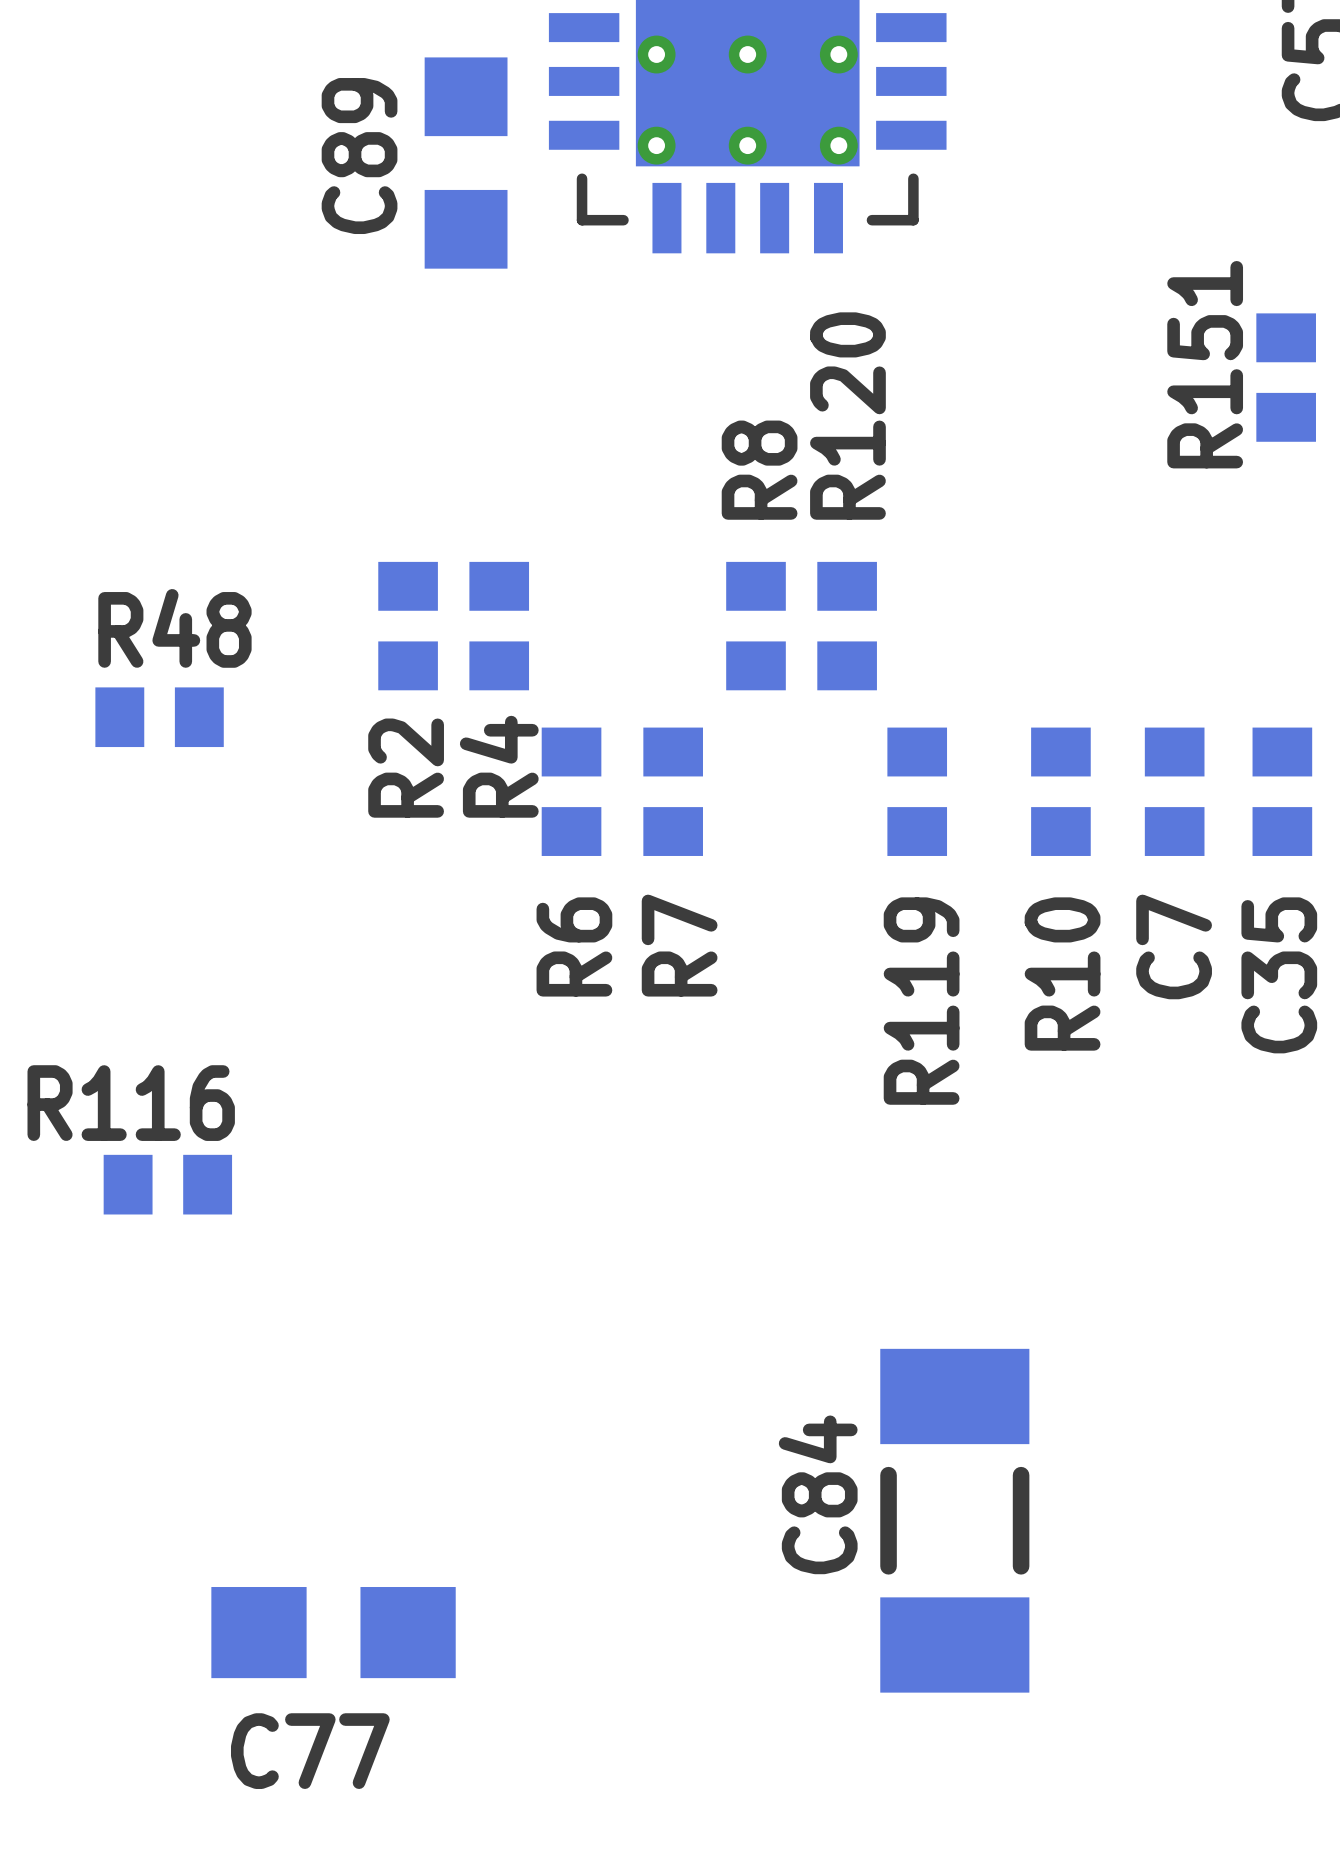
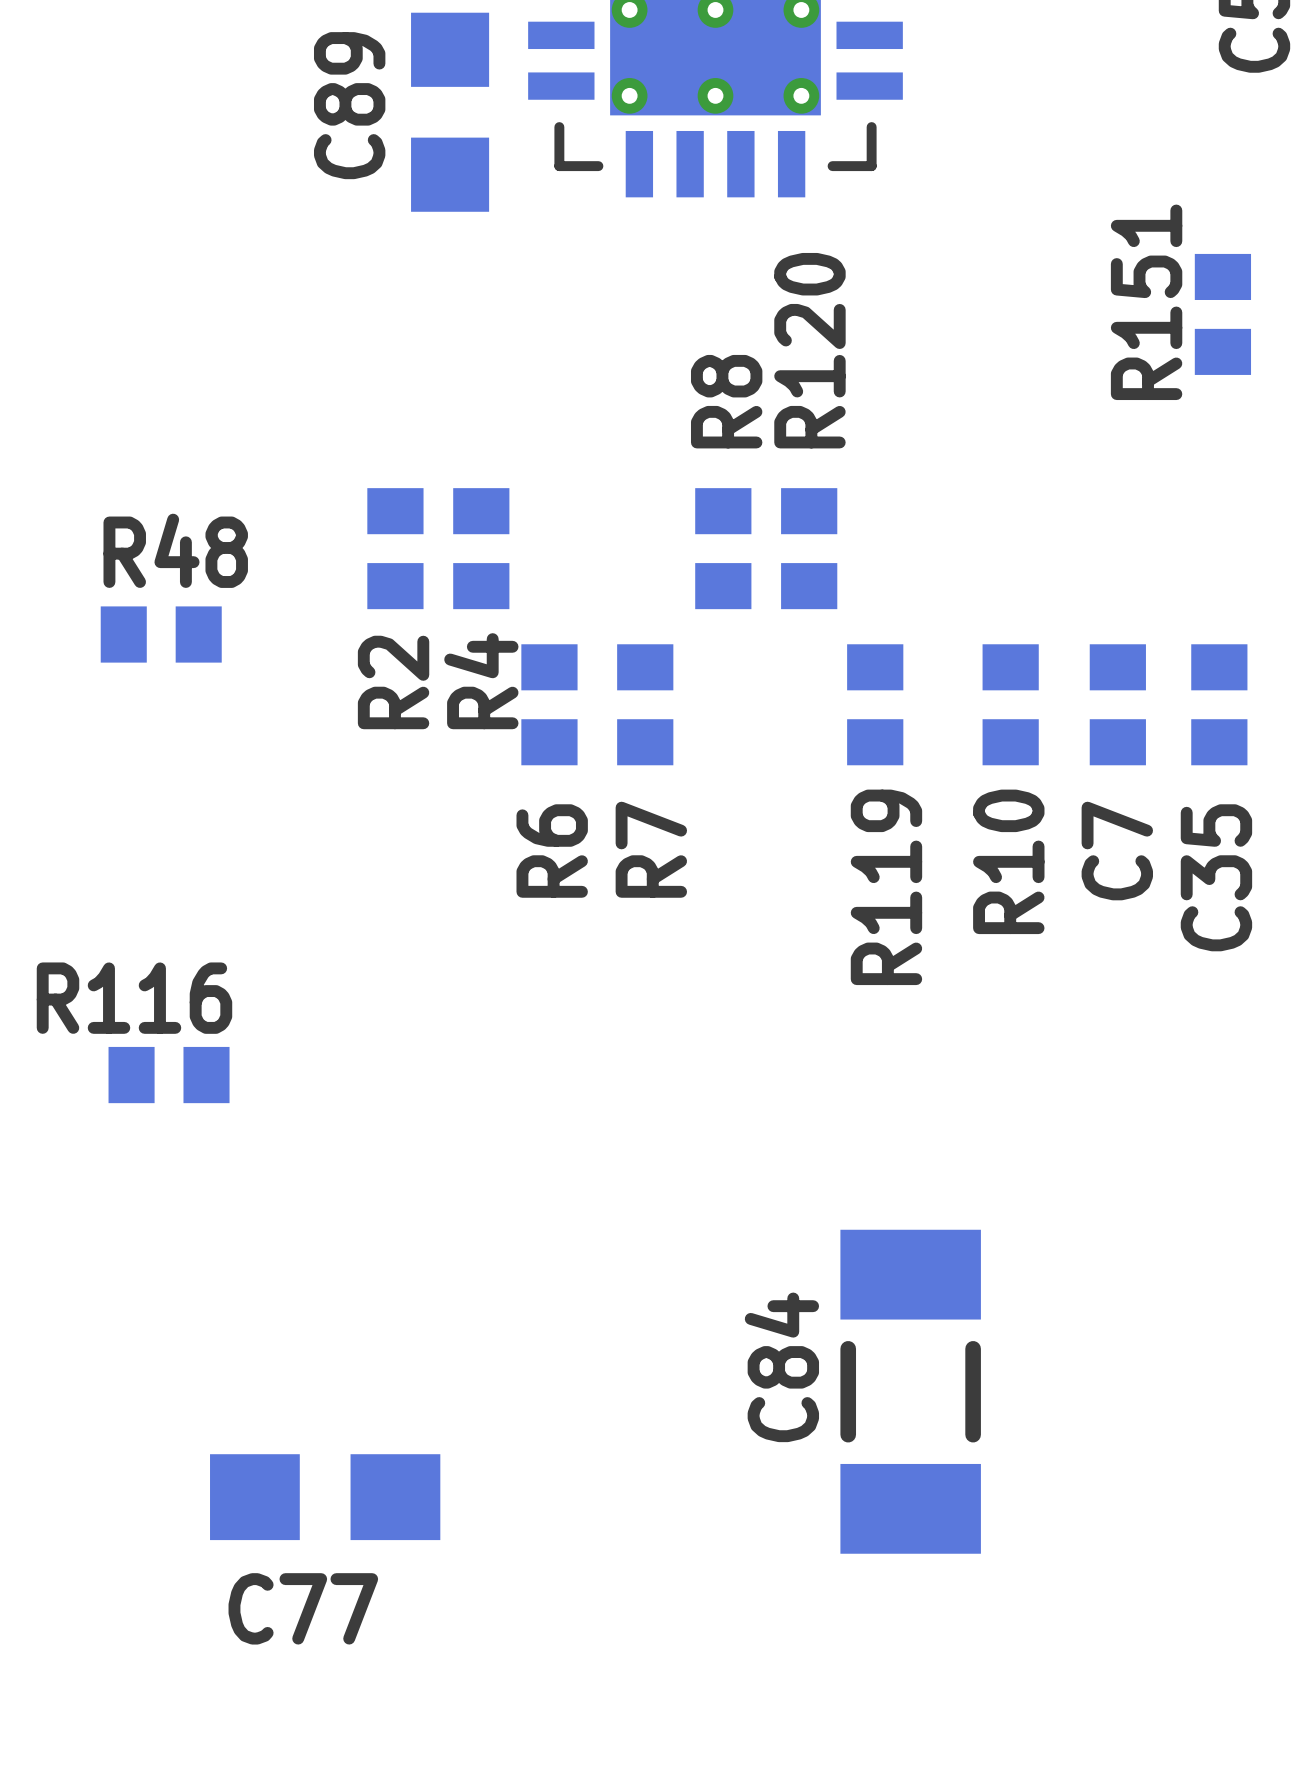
R10 name position: R10 (1062, 974) -> R10 (1008, 861)
R119 name position: R119 (921, 1001) -> R119 (886, 887)

